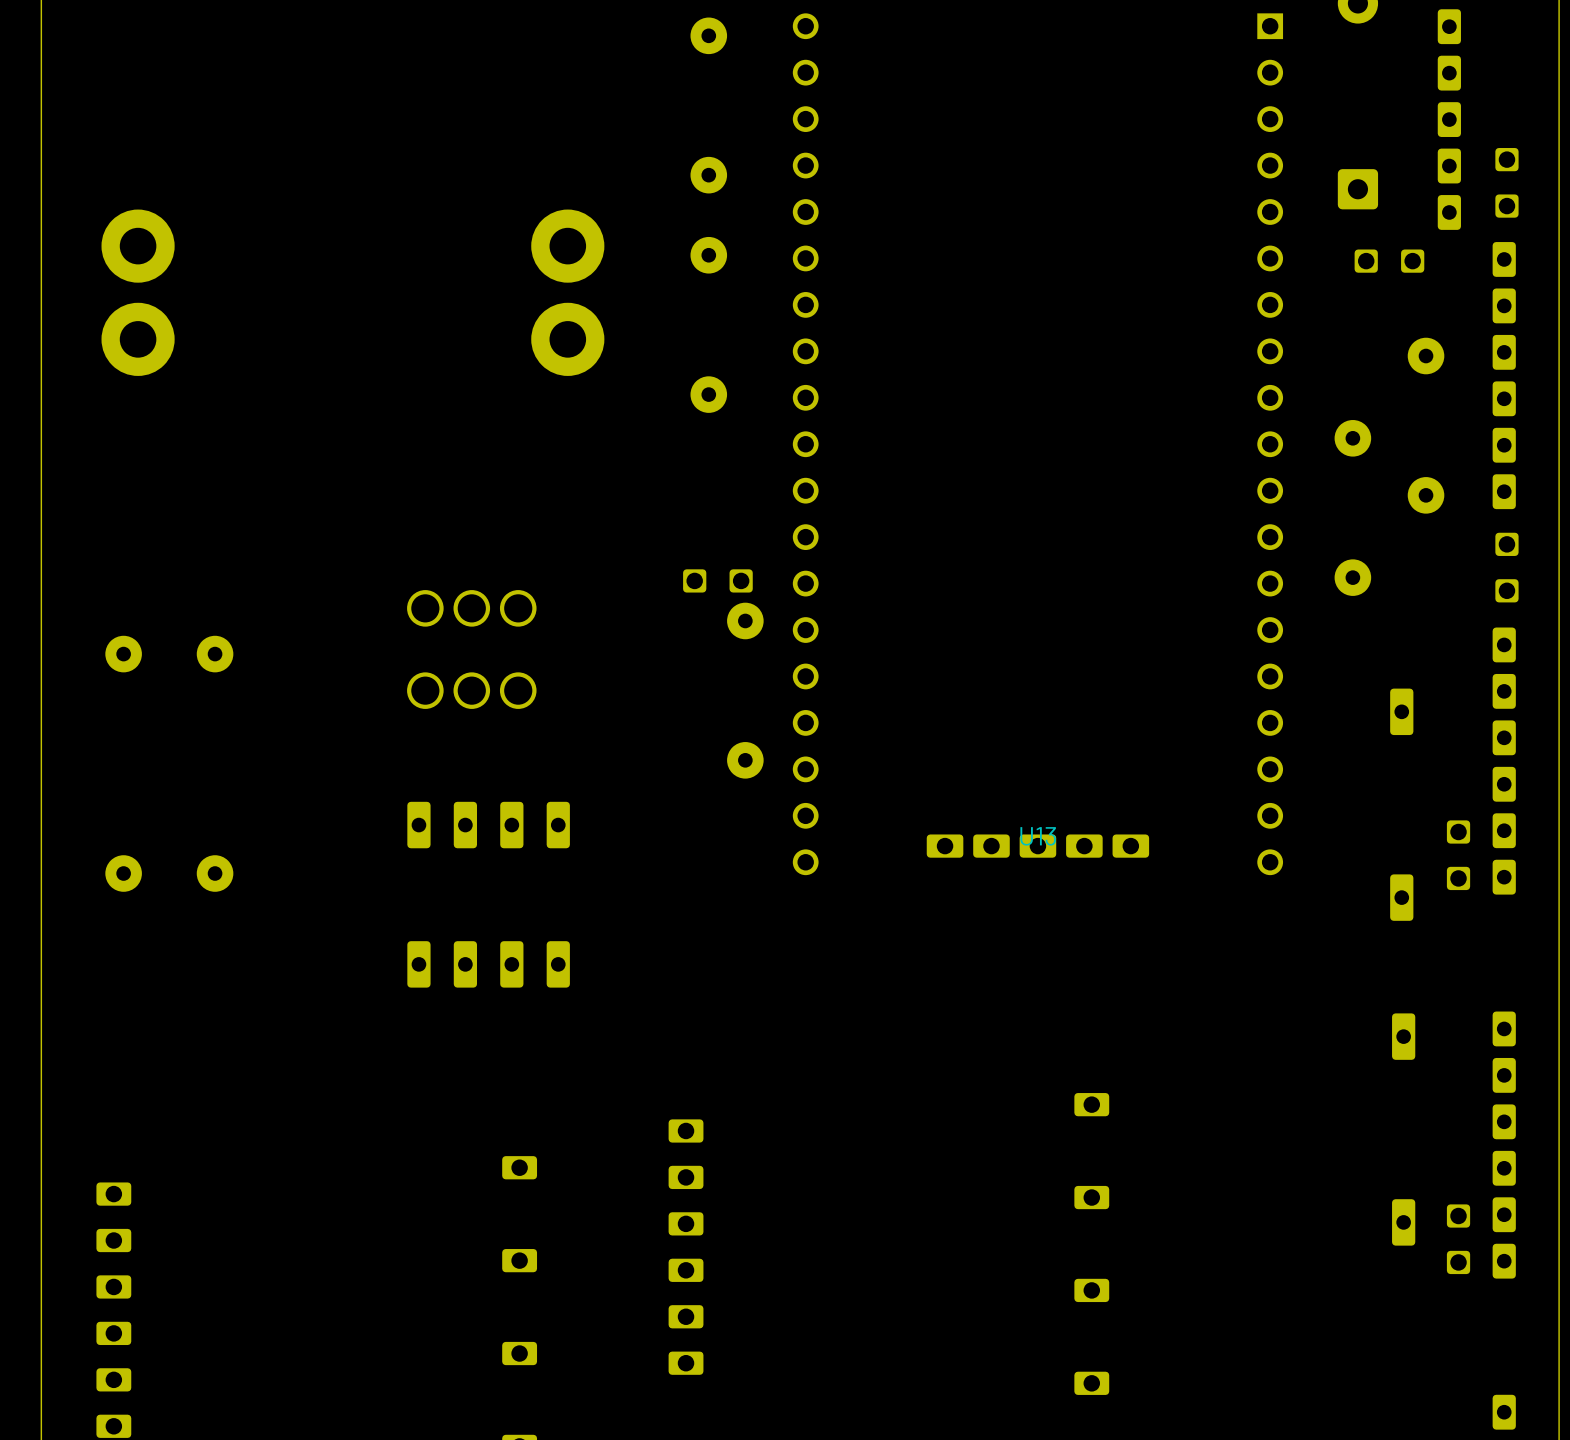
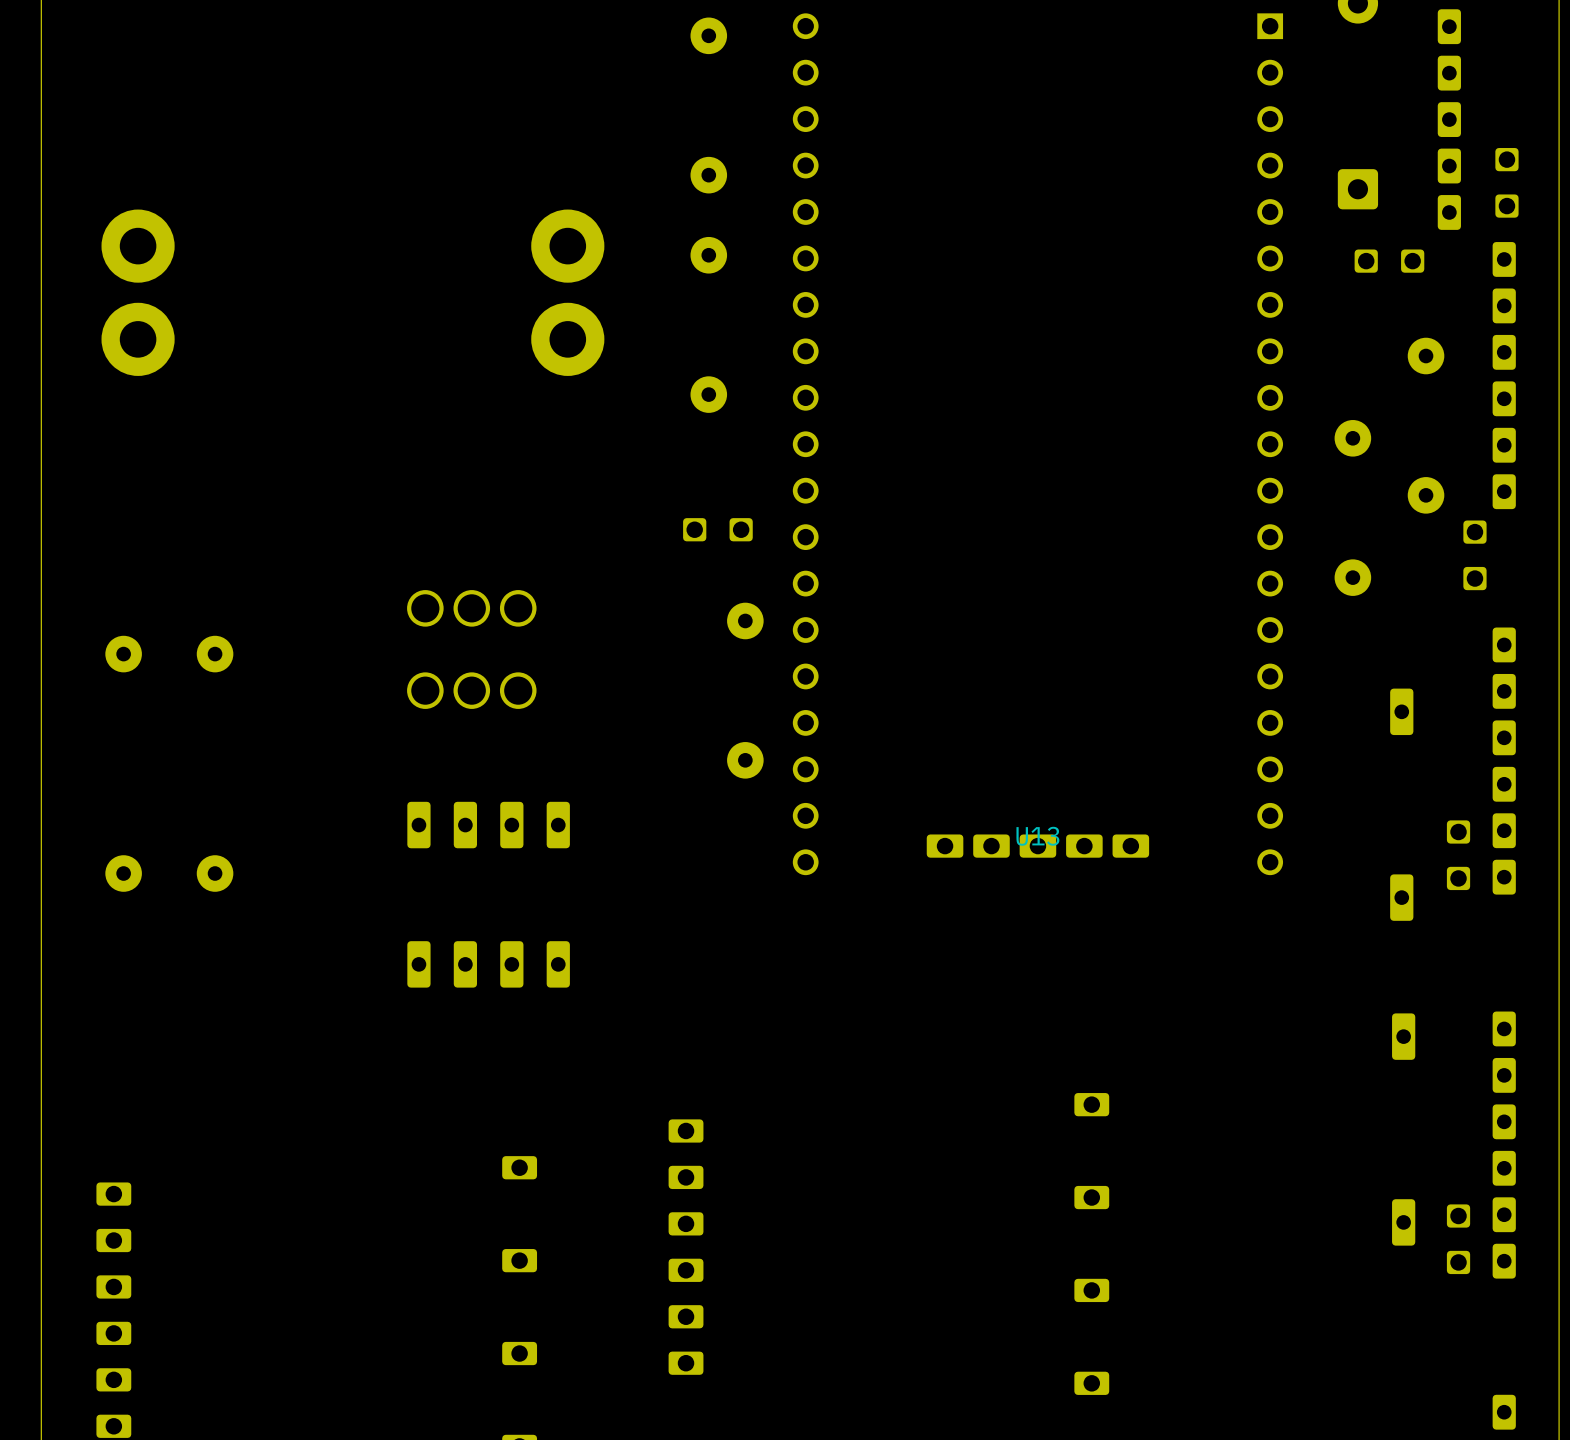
part position: (1506, 567) -> (1474, 555)
part position: (717, 580) -> (717, 529)

